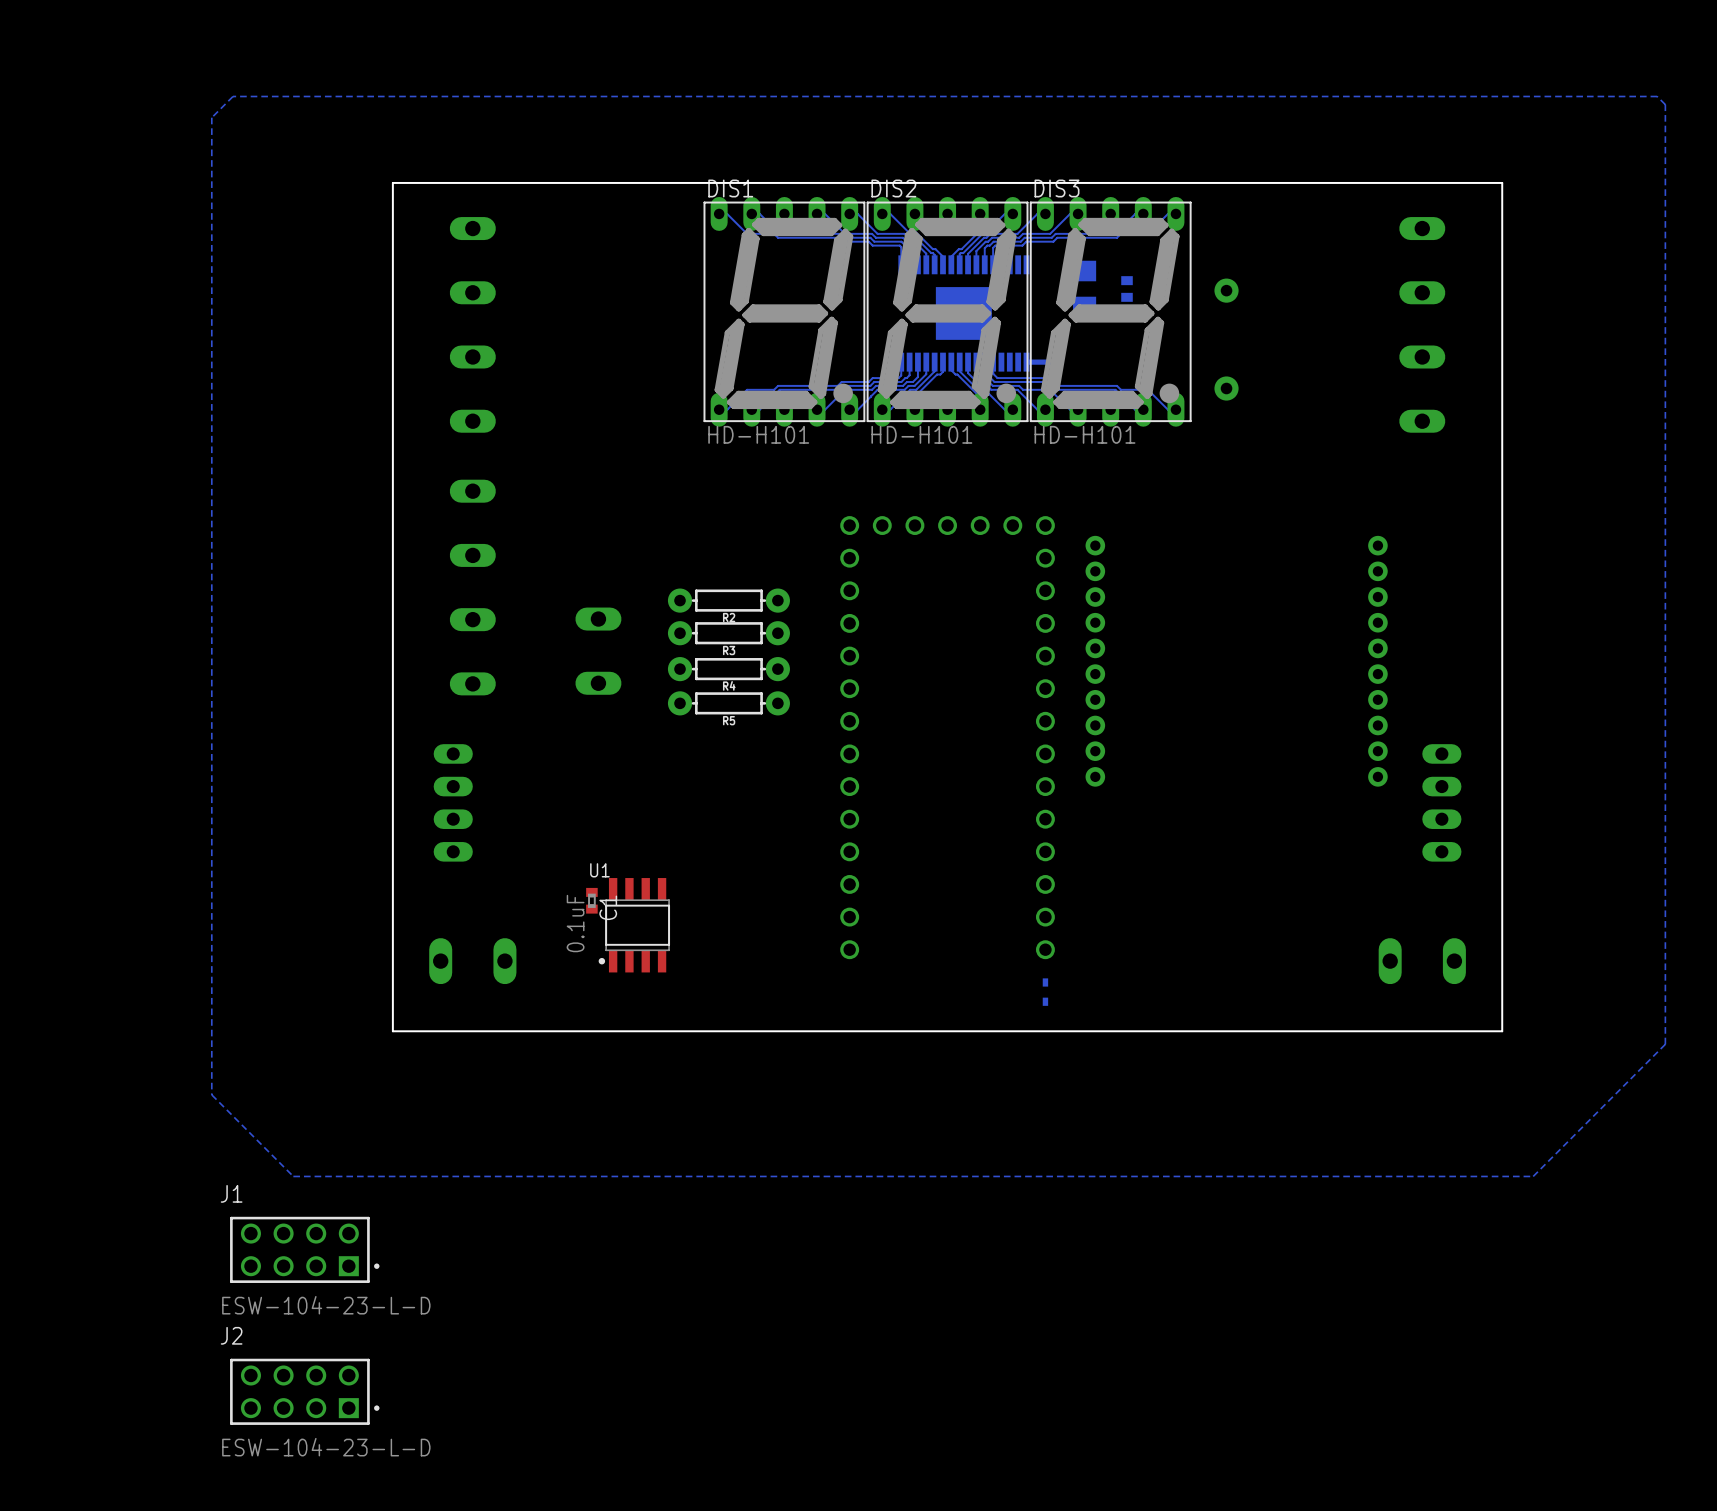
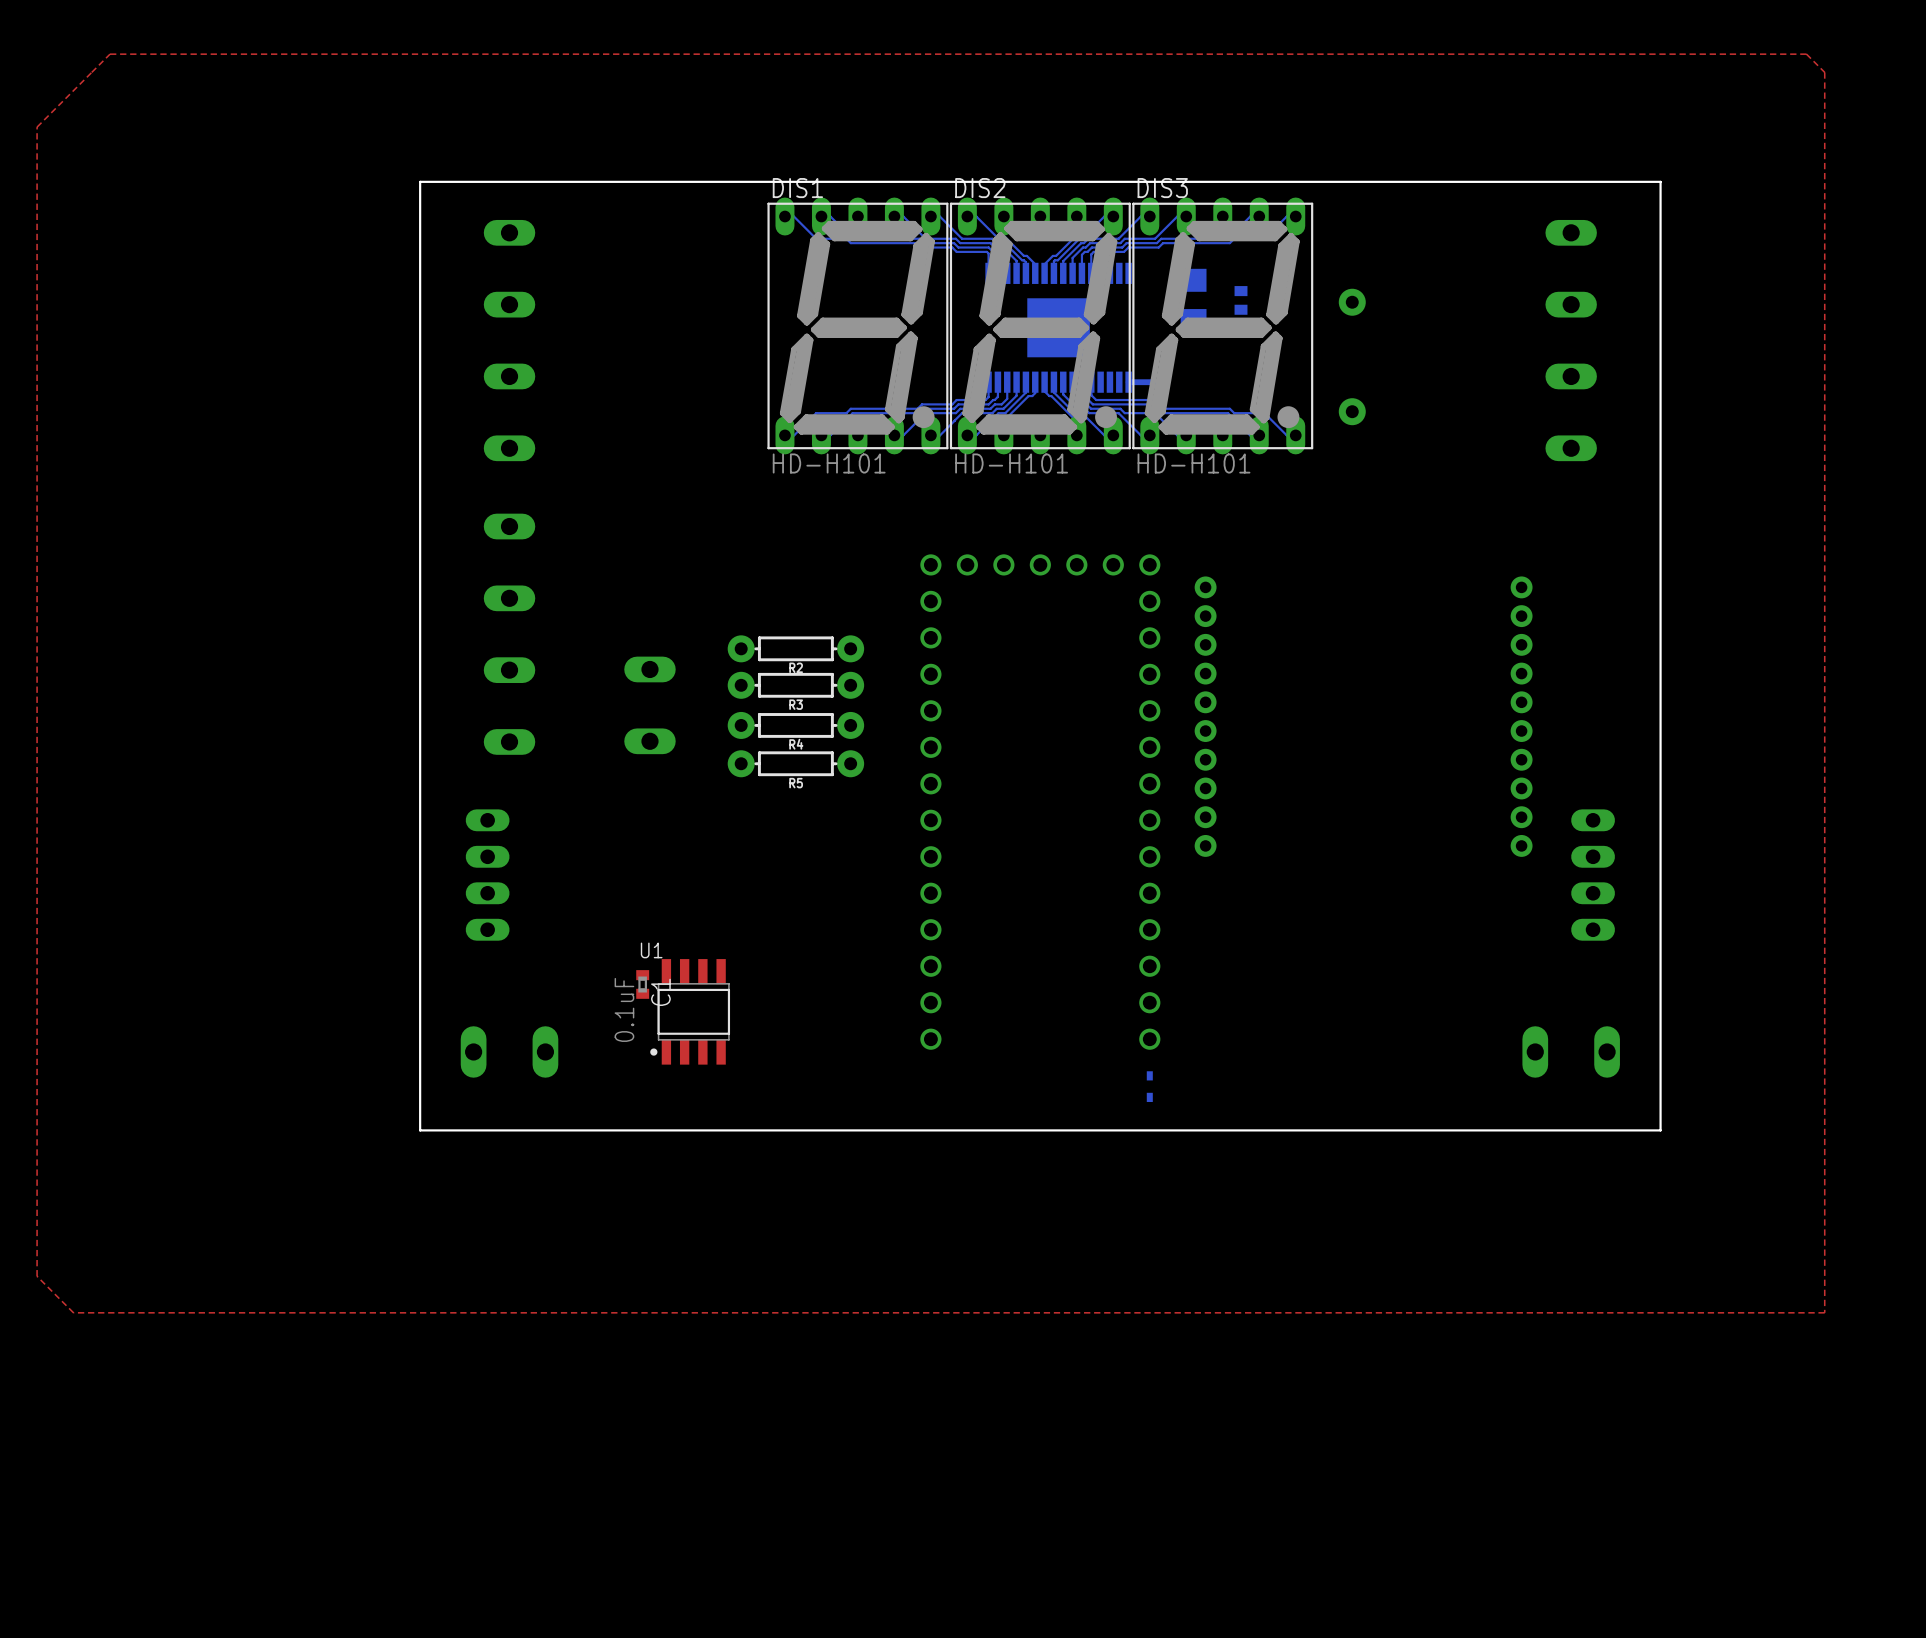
top zone outline: none -> (110, 54) (37, 127) (37, 1276) (73, 1312) (1824, 1312) (1824, 72) (1806, 54) (110, 54)
bottom zone outline: (233, 96) (1657, 96) (1665, 104) (1665, 1044) (1533, 1176) (293, 1176) (211, 1094) (211, 117) (233, 96) -> none
J1: ESW-104-23-L-D (304, 1249) -> none
J2: ESW-104-23-L-D (304, 1391) -> none

